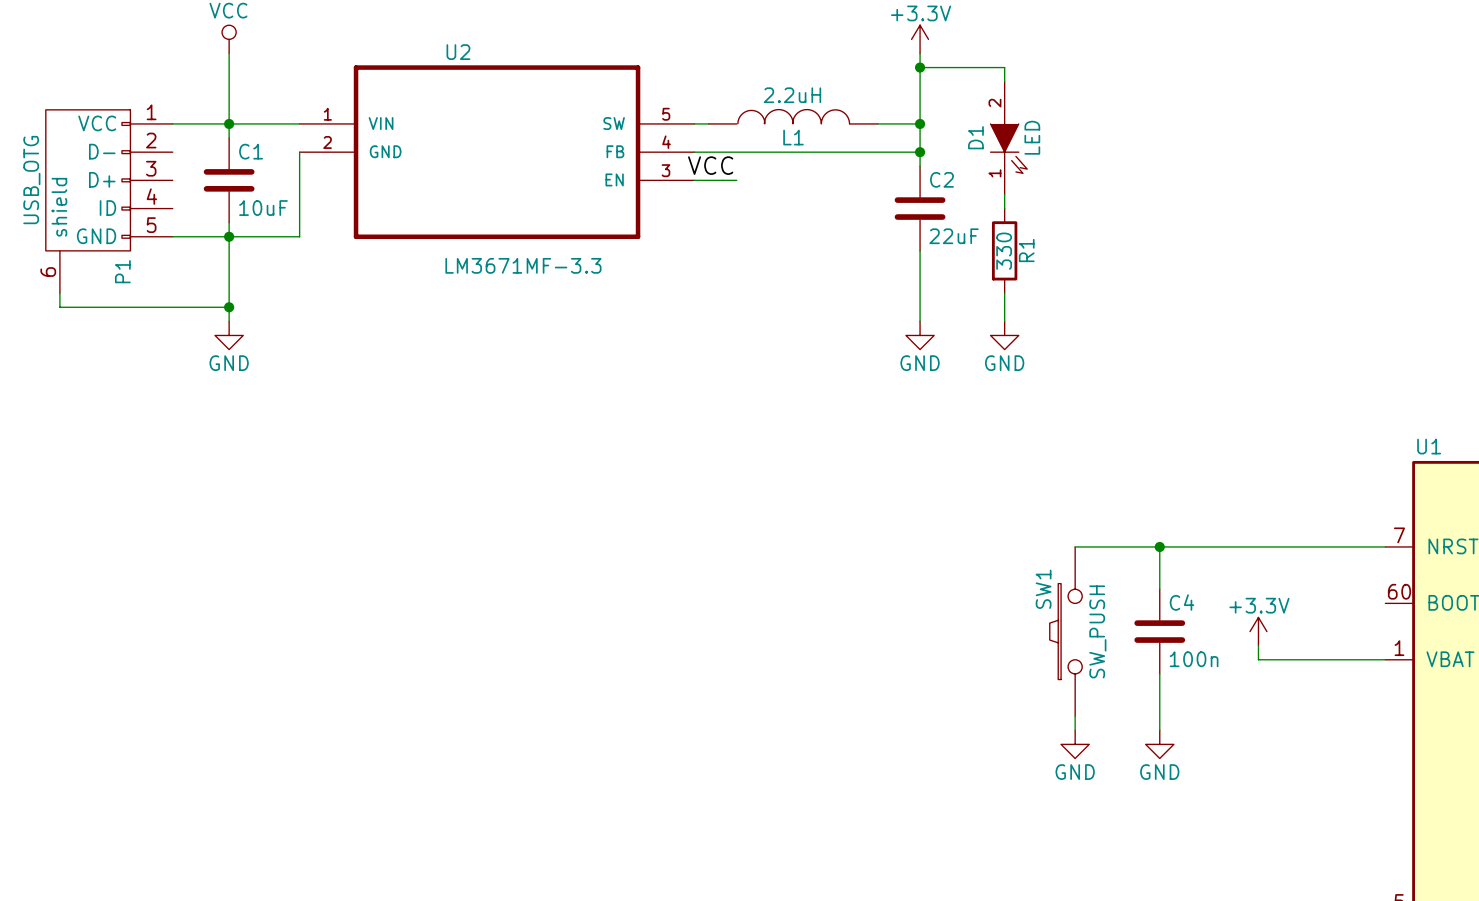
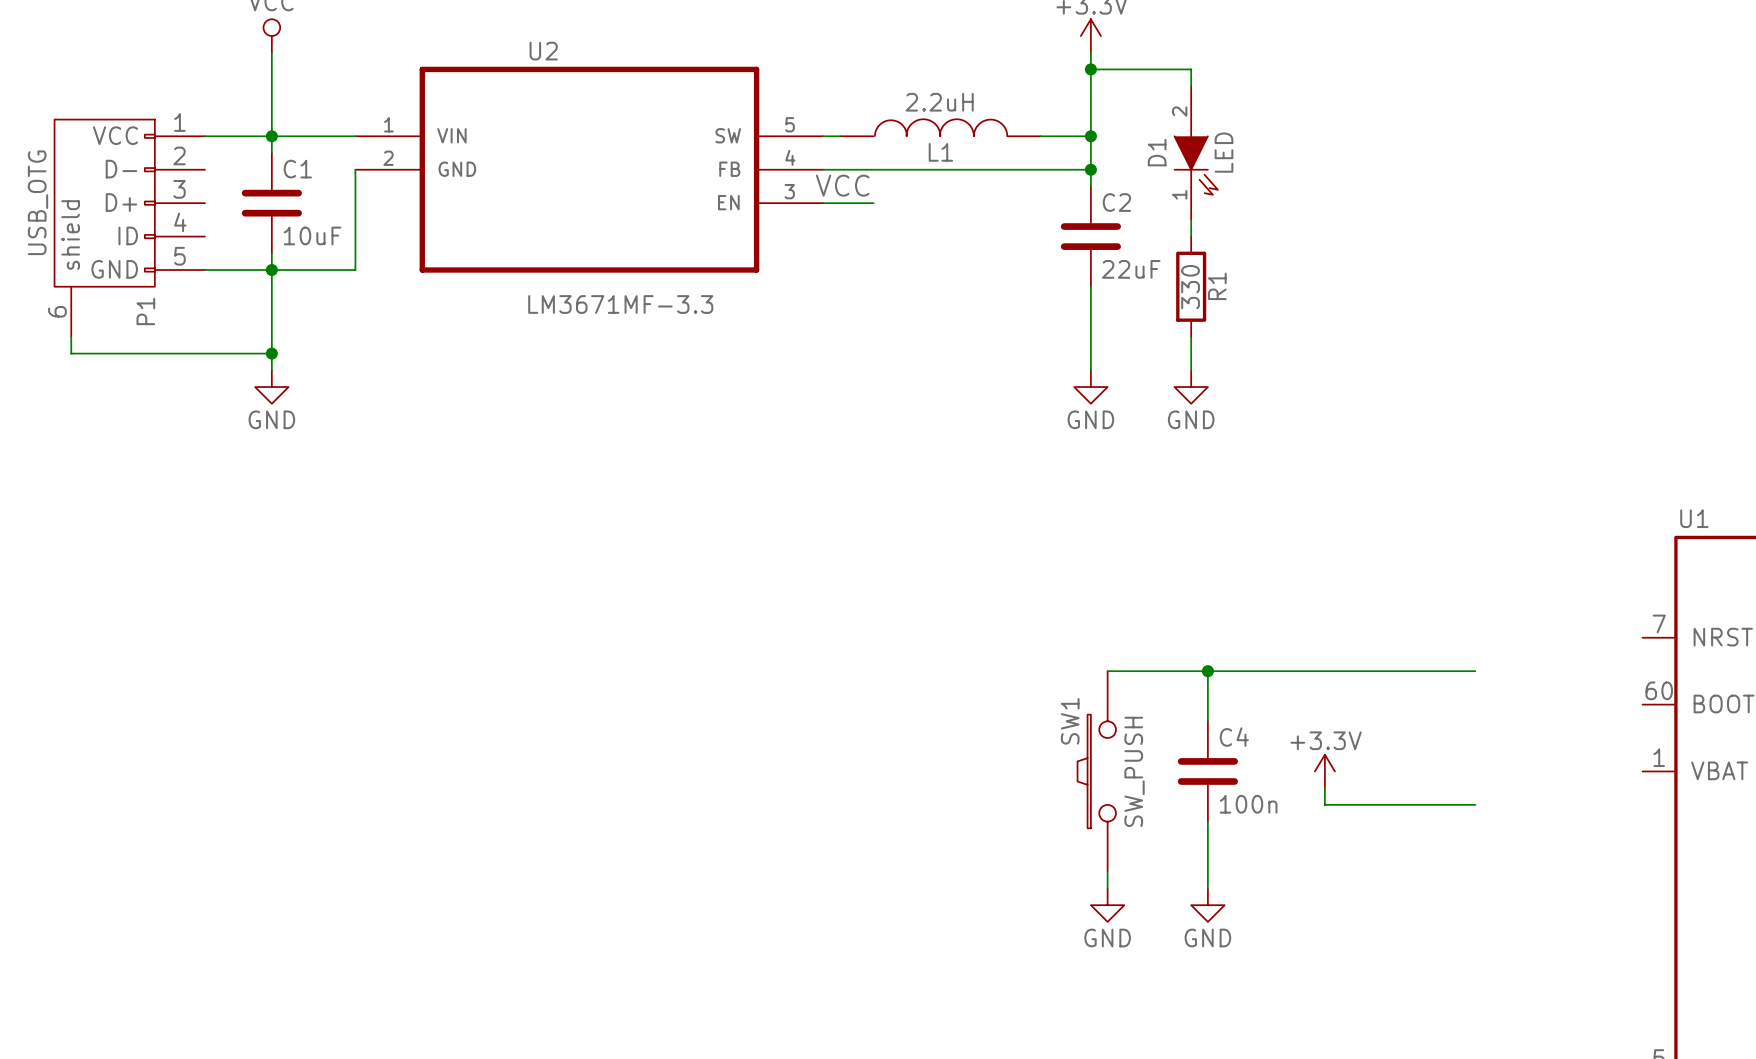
wire: (1075, 546) (1385, 546) -> (1107, 671) (1475, 671)
wire: (1159, 546) (1159, 589) -> (1207, 671) (1207, 721)
junction: (1159, 546) -> none
junction: none -> (1207, 671)
SW1 position: (1065, 631) -> (1096, 771)
C4 position: (1159, 631) -> (1207, 771)
power symbol position: +3.3V (1258, 631) -> +3.3V (1324, 771)
wire: (1258, 645) (1258, 659) (1385, 659) -> (1324, 788) (1324, 804) (1475, 804)
wire: (1159, 673) (1159, 730) -> (1207, 821) (1207, 888)
wire: (1075, 716) (1075, 730) -> (1107, 871) (1107, 888)
power symbol position: GND (1075, 744) -> GND (1207, 905)
power symbol: GND (1159, 744) -> none
power symbol: none -> GND (1107, 905)

